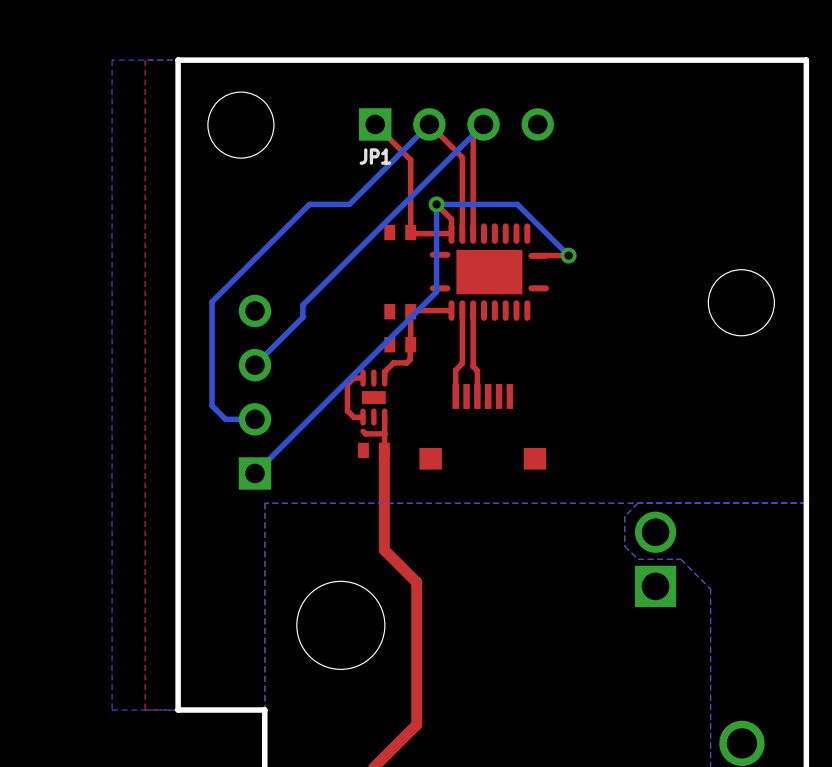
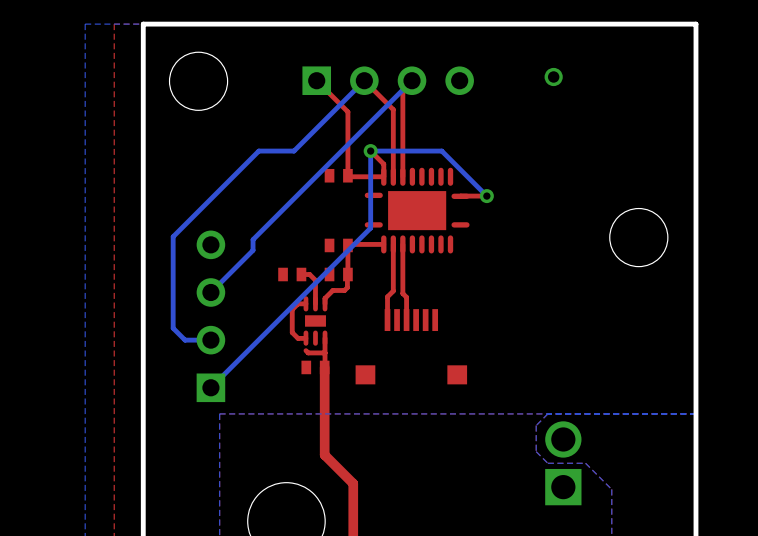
via: none -> (553, 76)
JP1 name: JP1 (375, 156) -> none
part: none -> (292, 274)
top track: none -> (301, 274) (309, 274) (315, 280) (315, 303)

